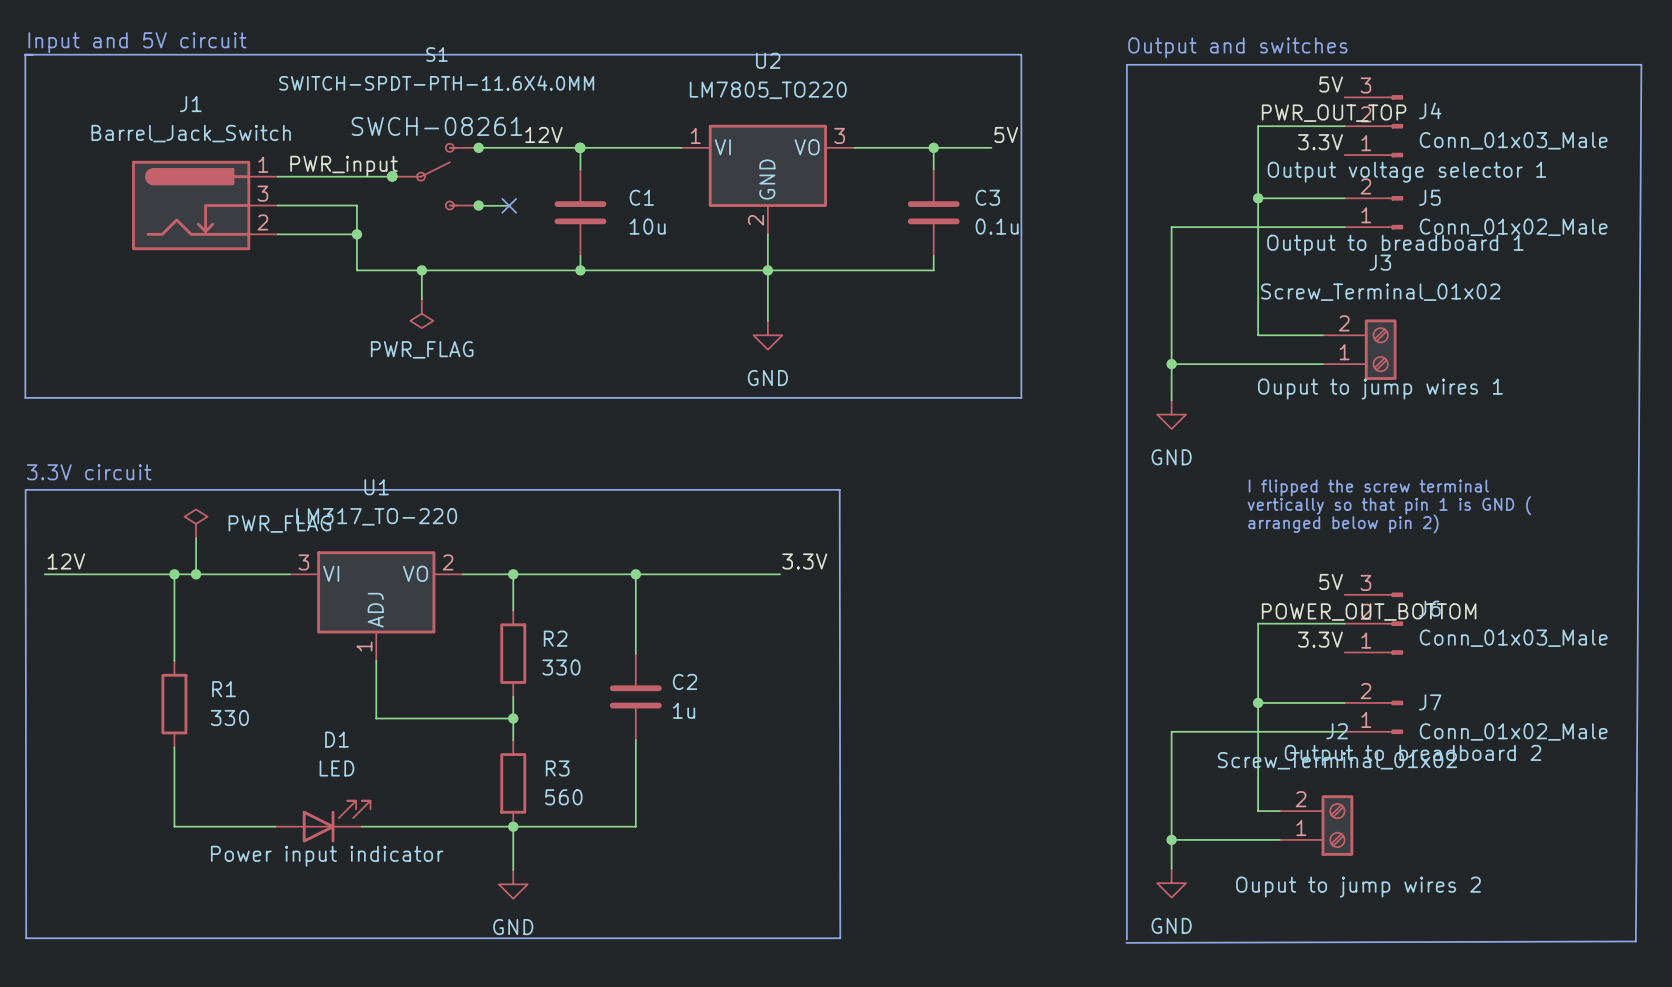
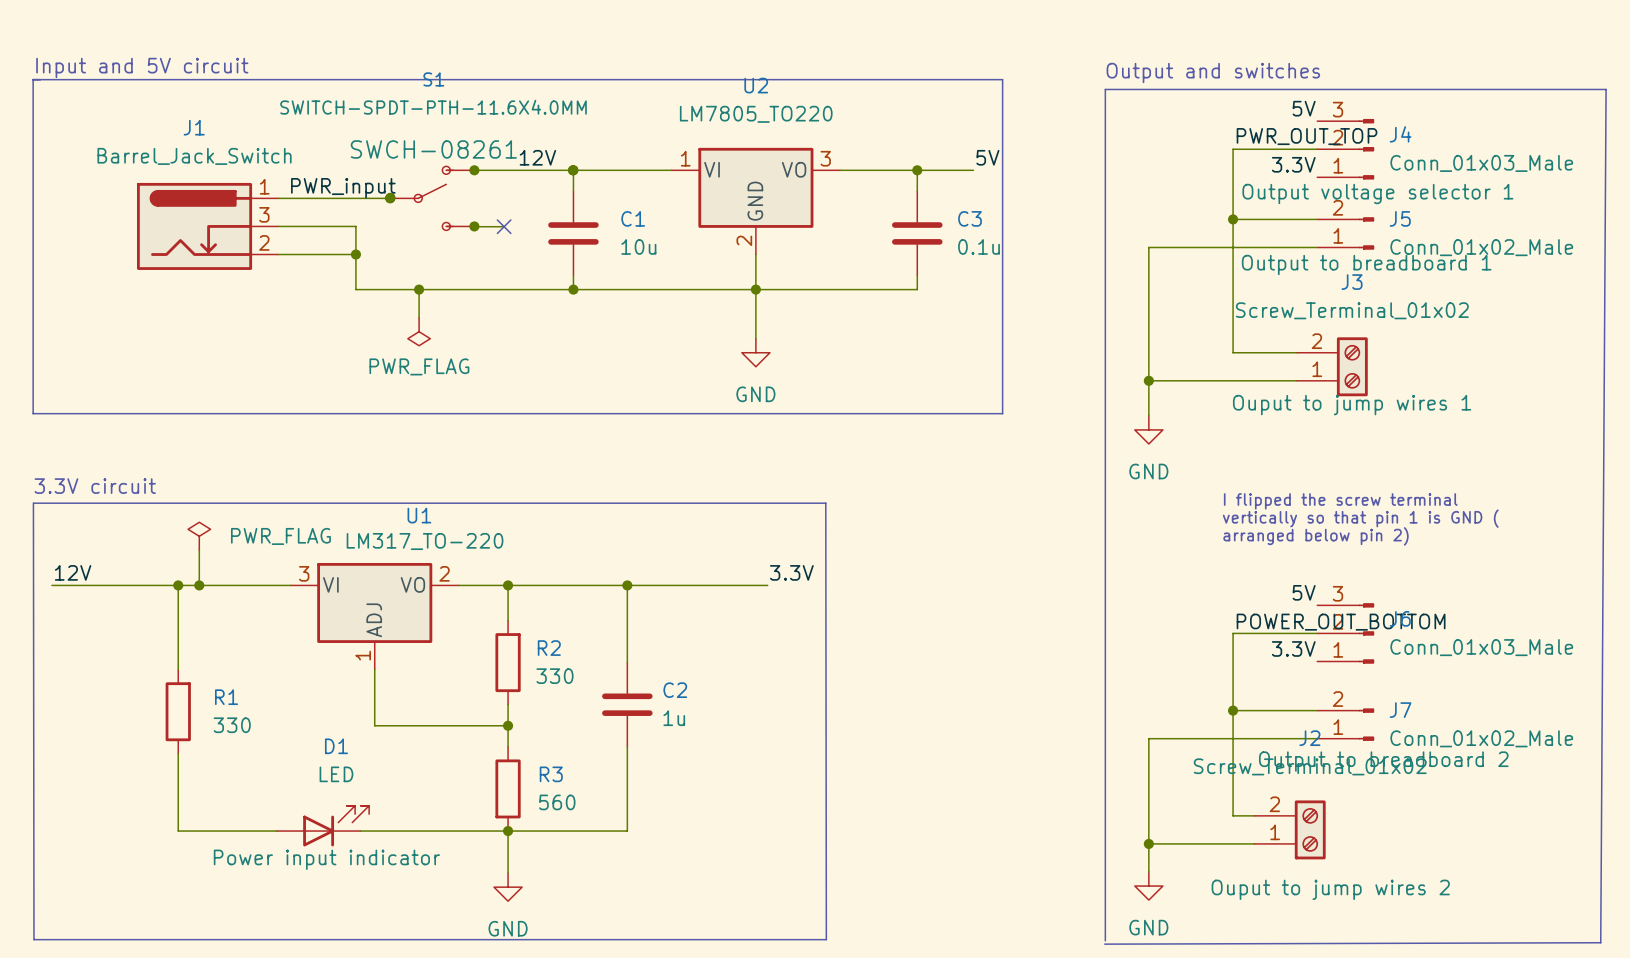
U1 name position: U1 (376, 487) -> U1 (419, 515)
U1 value position: LM317_TO-220 (376, 516) -> LM317_TO-220 (425, 541)

